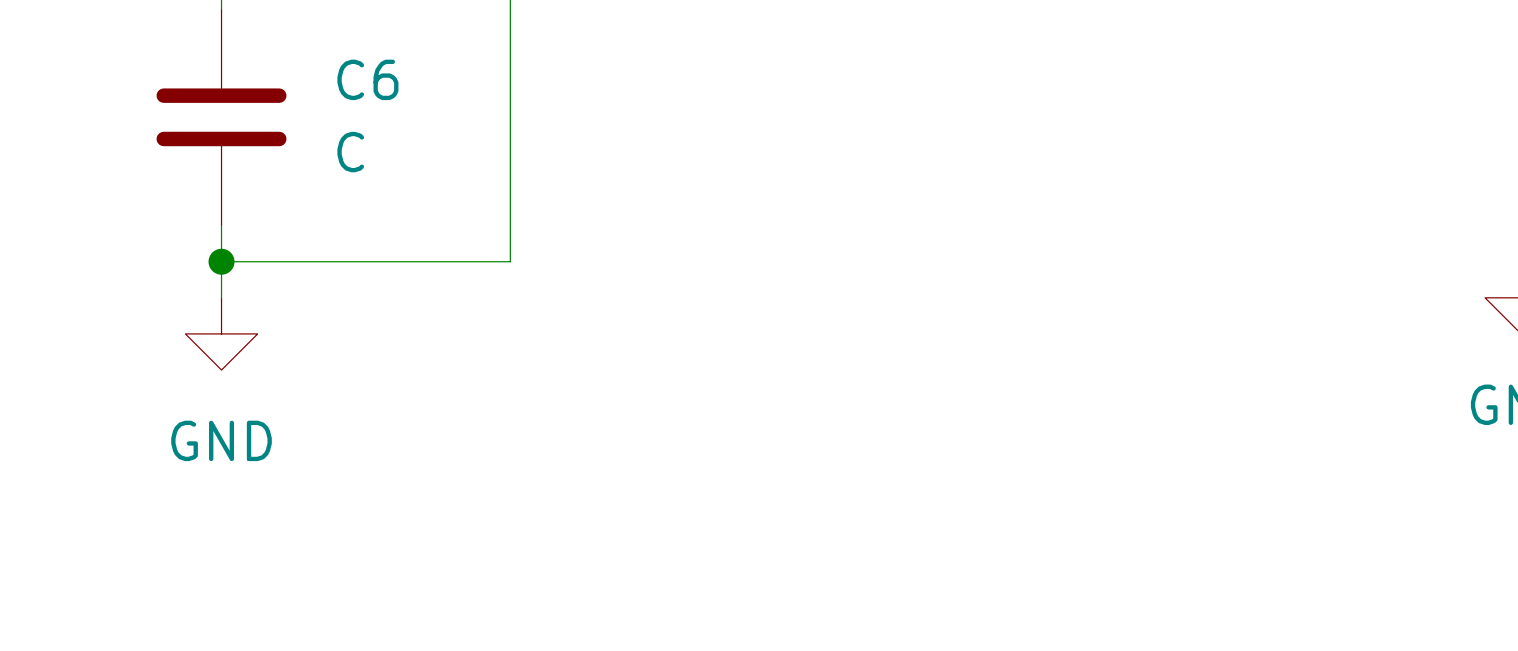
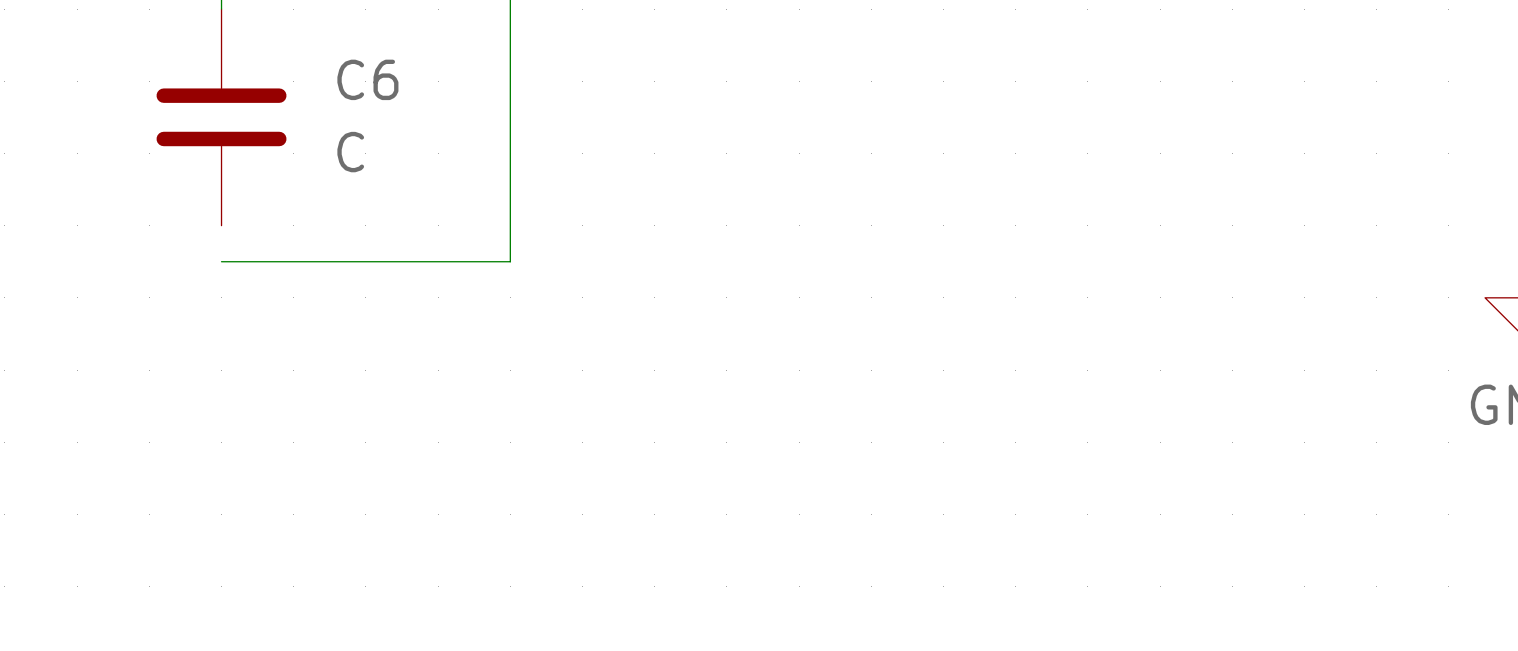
wire: (221, 225) (221, 297) -> none
junction: (221, 261) -> none
power symbol: GND (221, 333) -> none

